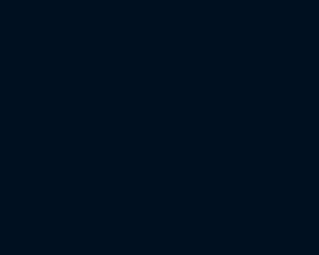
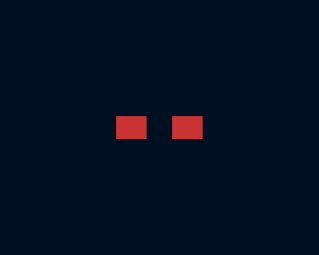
part: none -> (159, 127)

